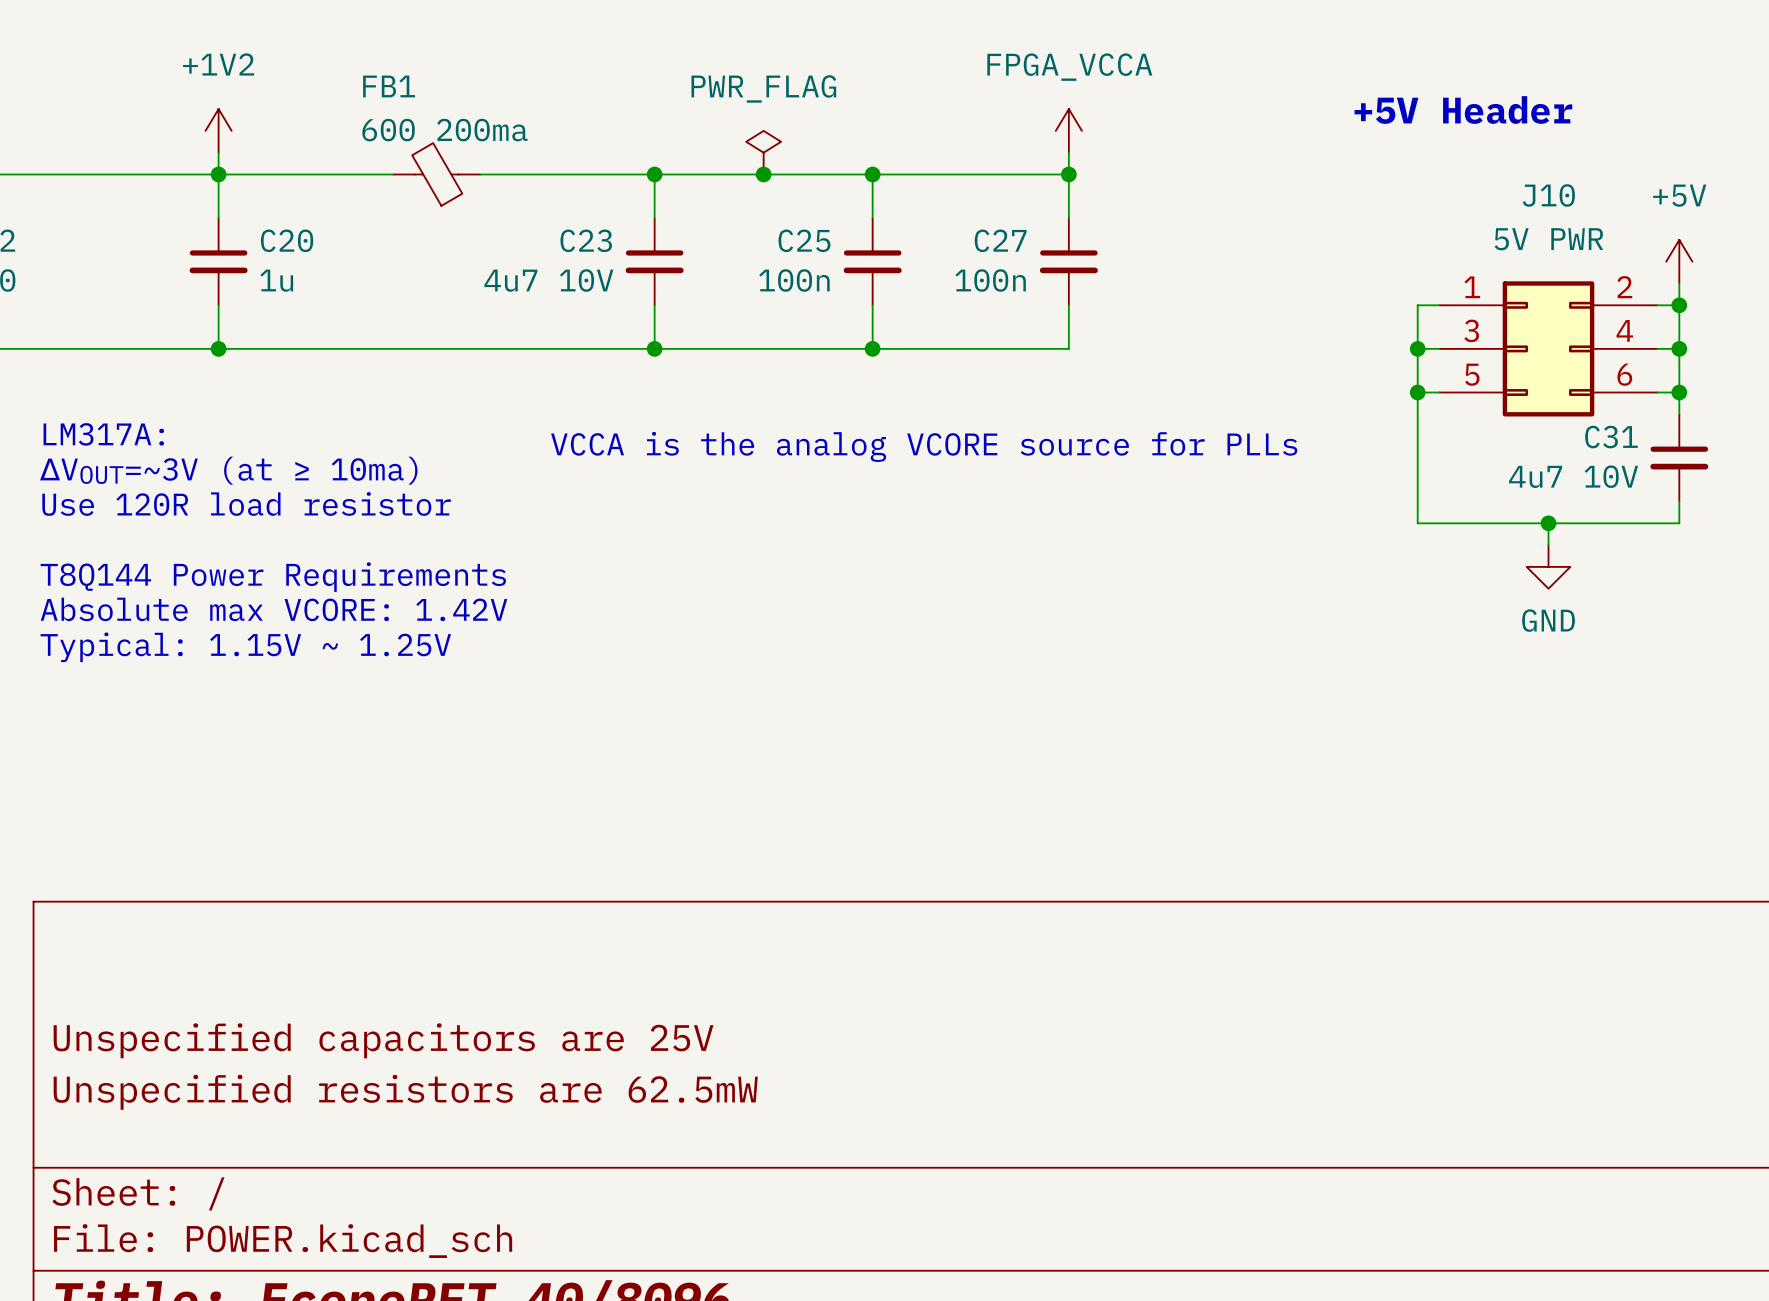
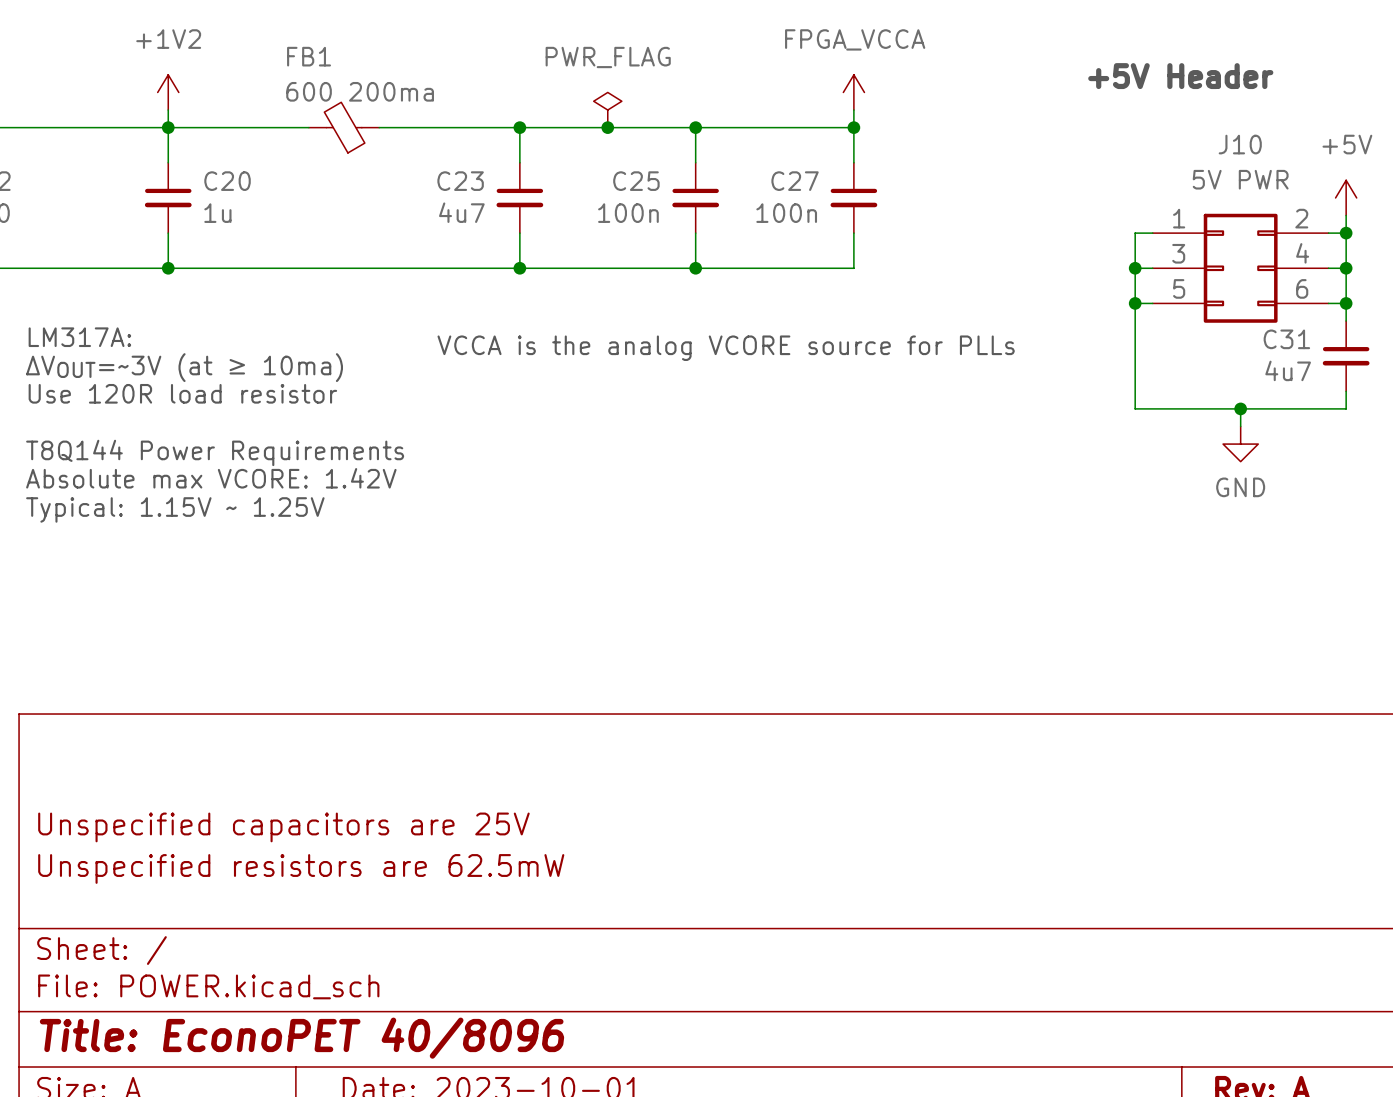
C23 value: 4u7 10V (548, 280) -> 4u7 (461, 212)
C31 value: 4u7 10V (1573, 476) -> 4u7 (1288, 370)

